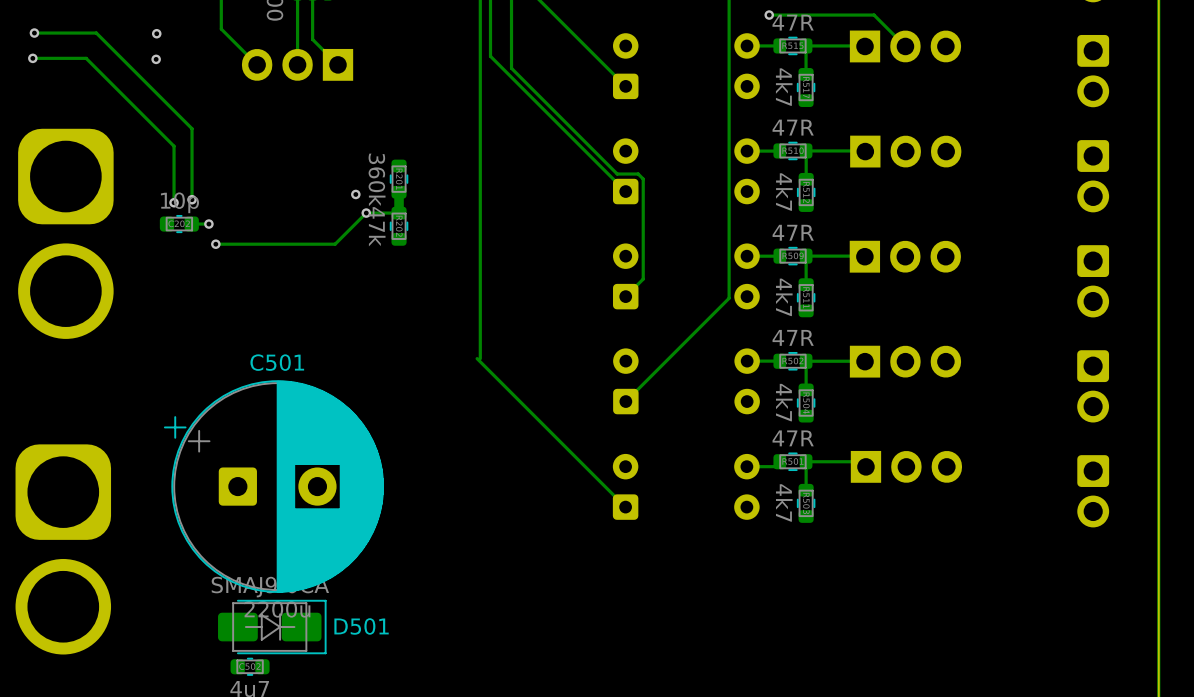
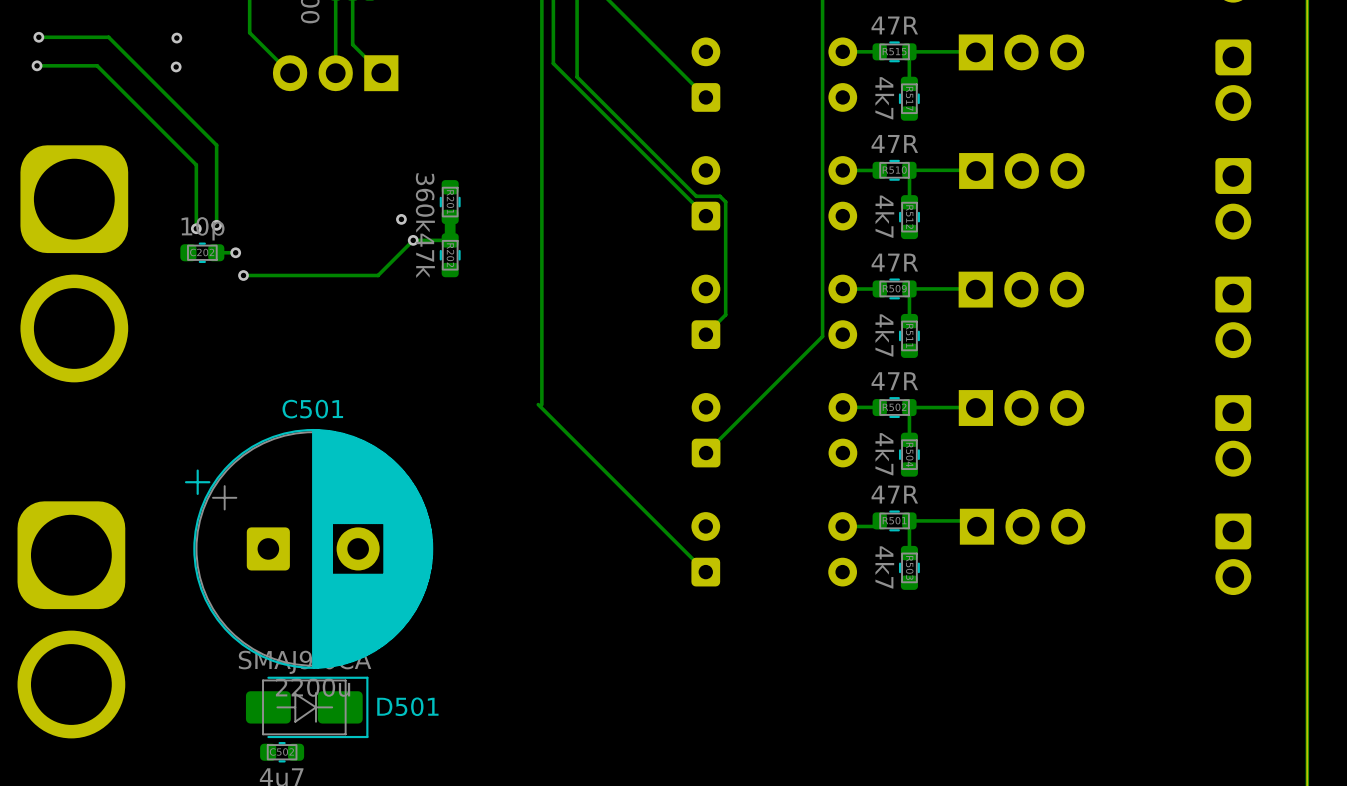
track: (769, 15) (874, 15) (905, 46) -> none
via: (769, 15) -> none

